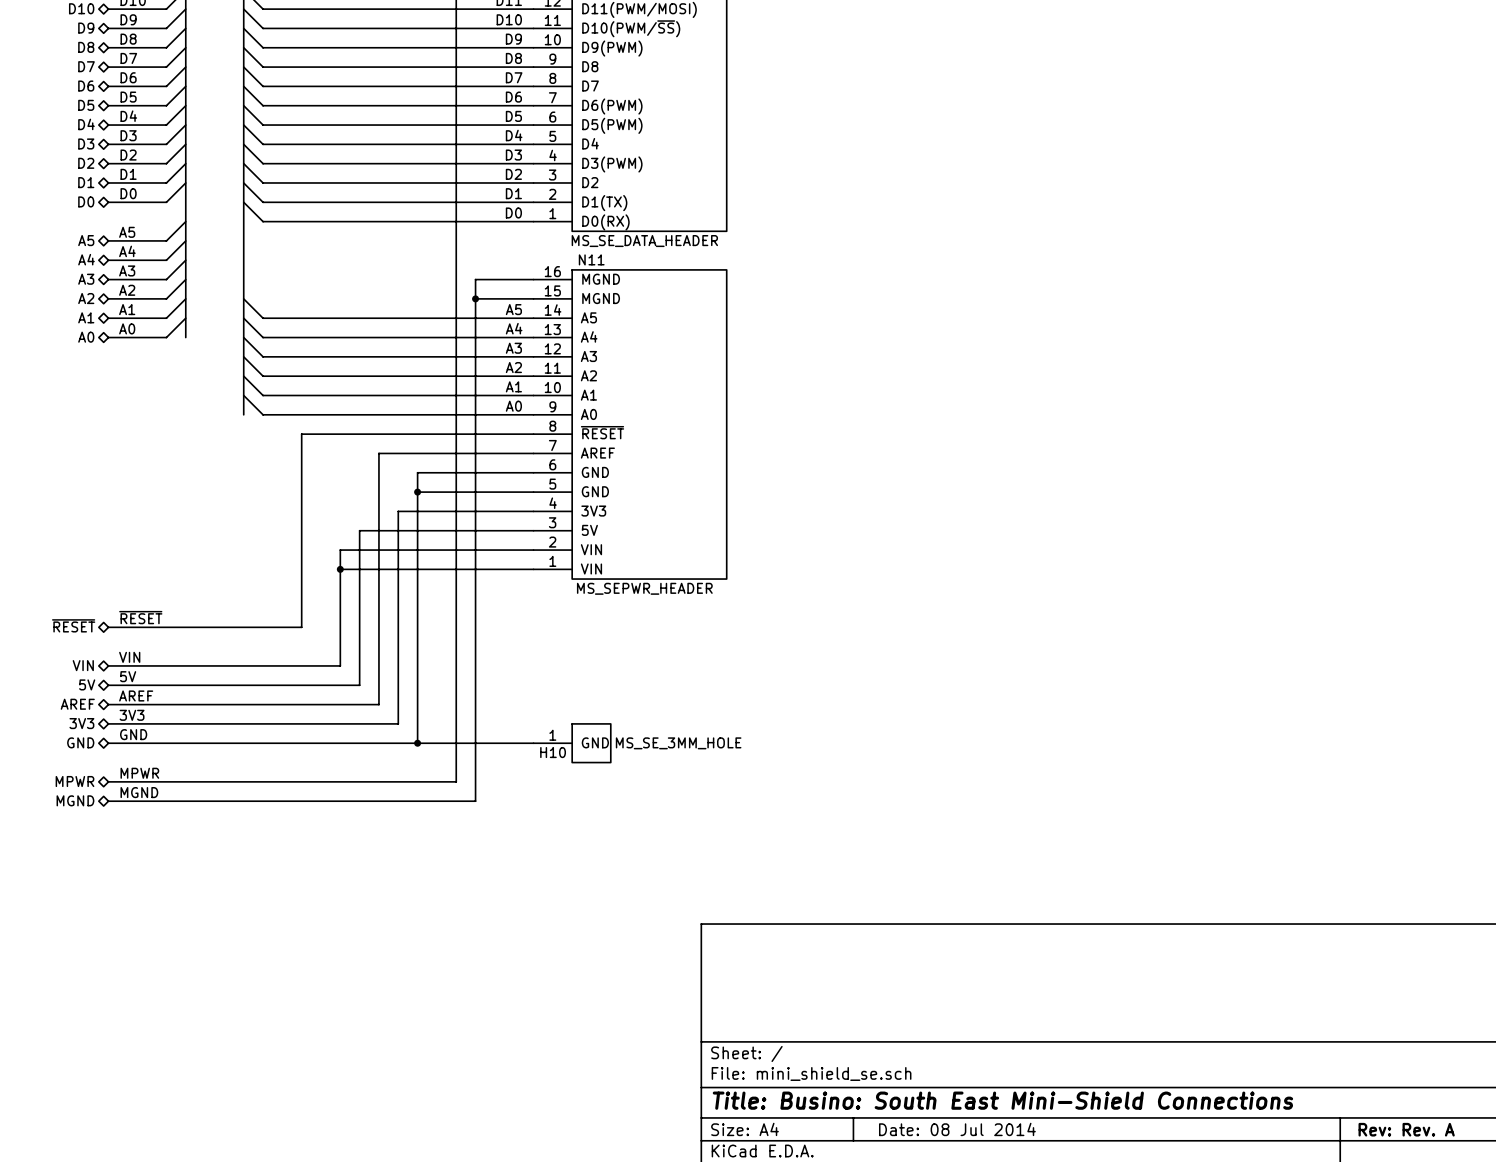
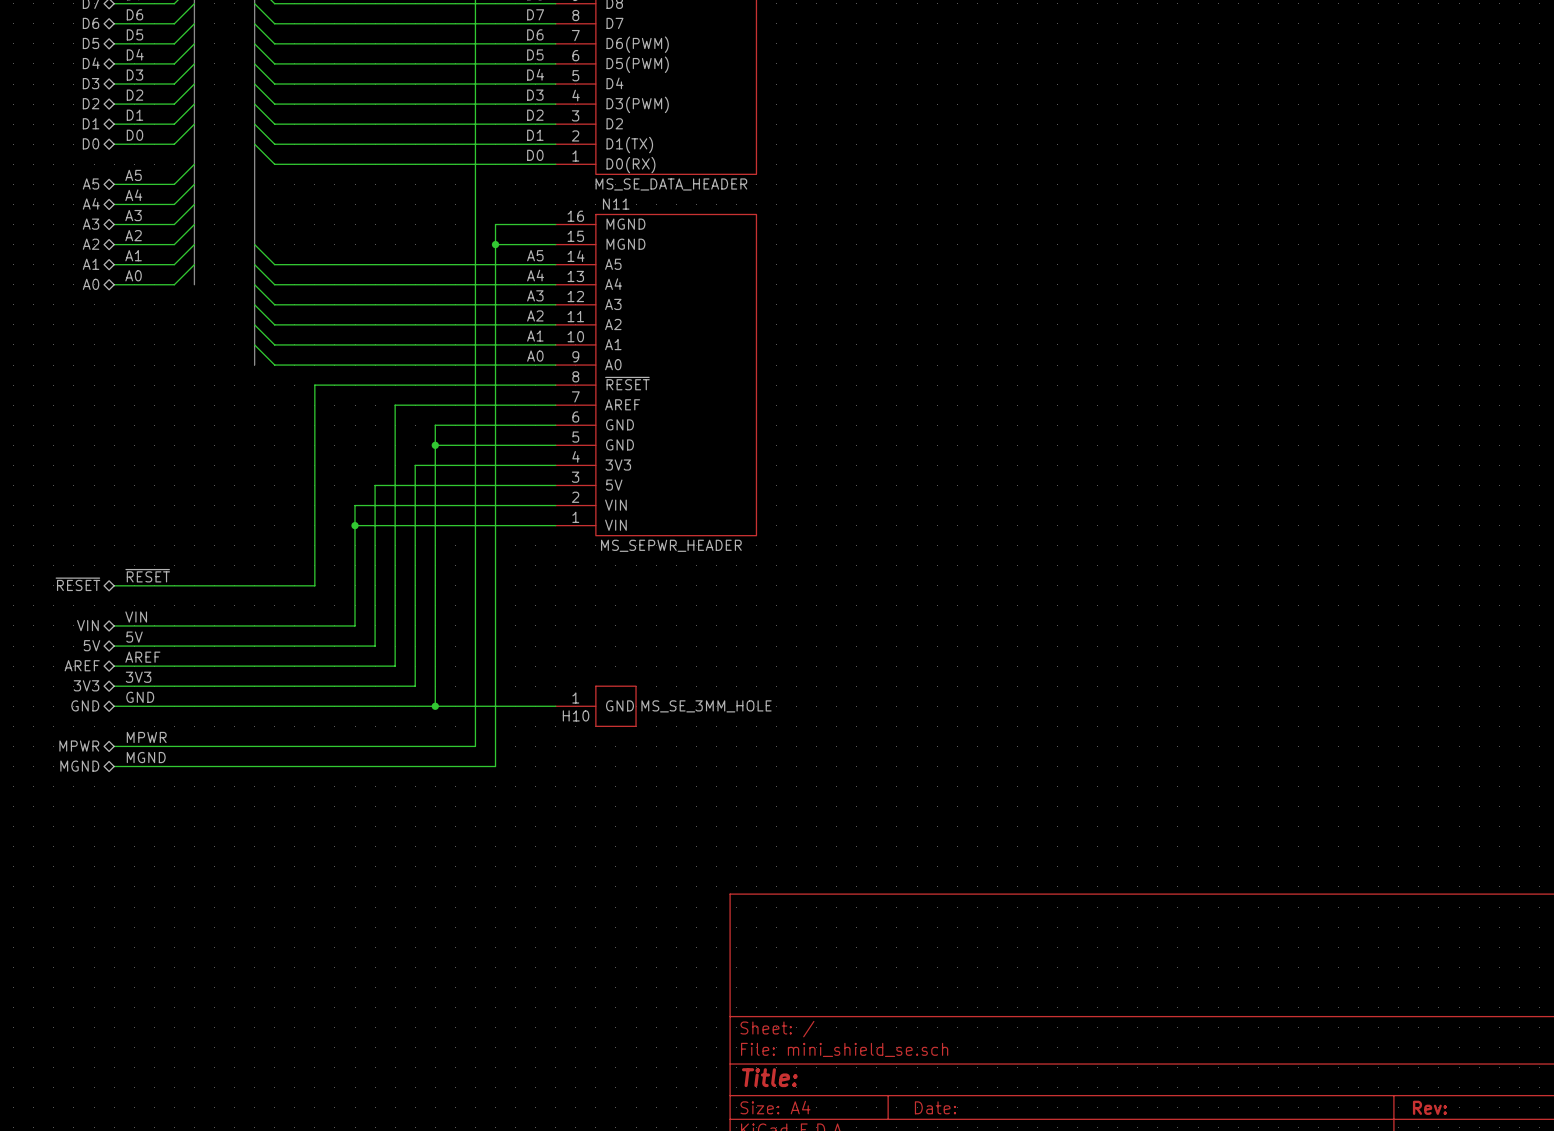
title block: Title: Busino: South East Mini-Shield Connections (1002, 1100) -> Title: (769, 1077)
title block: Date: 08 Jul 2014 (957, 1129) -> Date: (935, 1107)
title block: Rev: Rev. A (1406, 1129) -> Rev: (1429, 1107)

